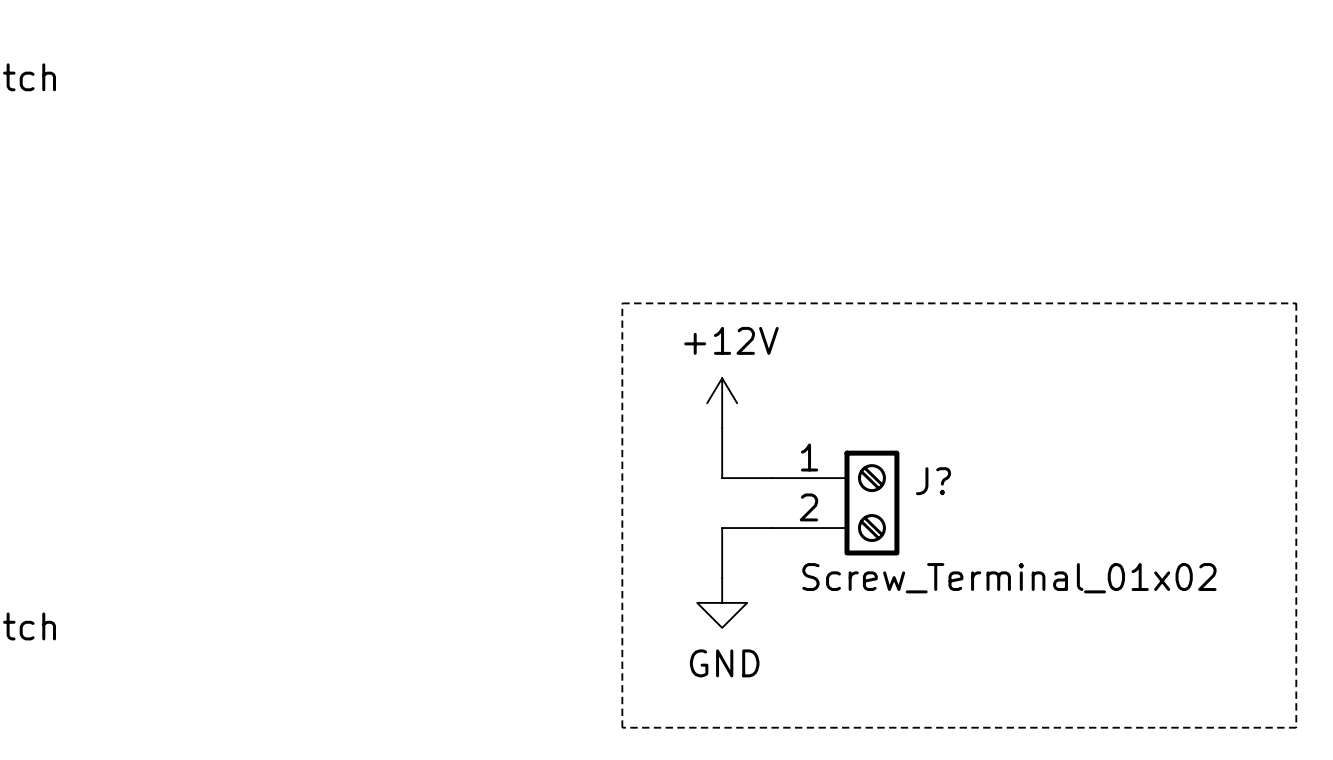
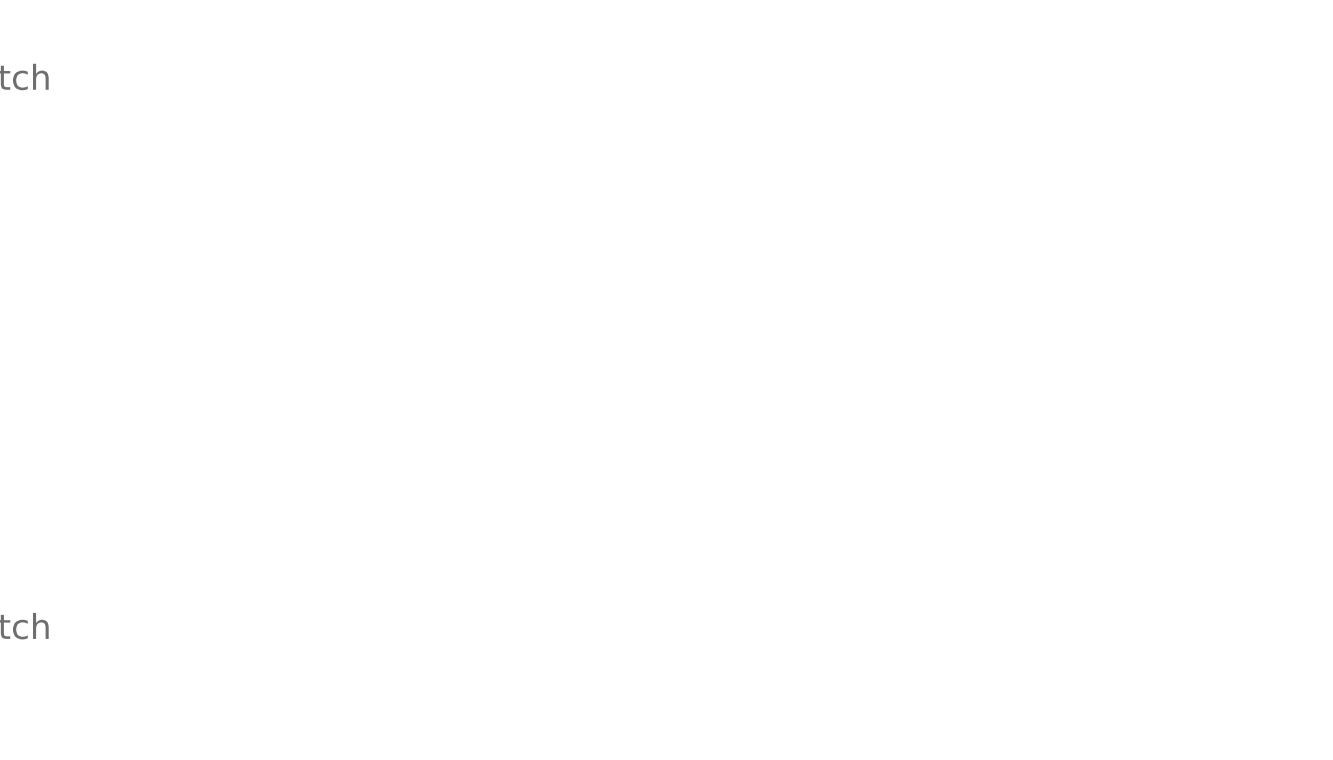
line: (622, 303) (1296, 303) (1296, 727) (622, 727) (622, 303) -> none
power symbol: +12V (722, 403) -> none
wire: (722, 428) (722, 478) (772, 478) -> none
J?: Screw_Terminal_01x02 (835, 503) -> none
wire: (772, 528) (722, 528) (722, 577) -> none
power symbol: GND (722, 602) -> none

